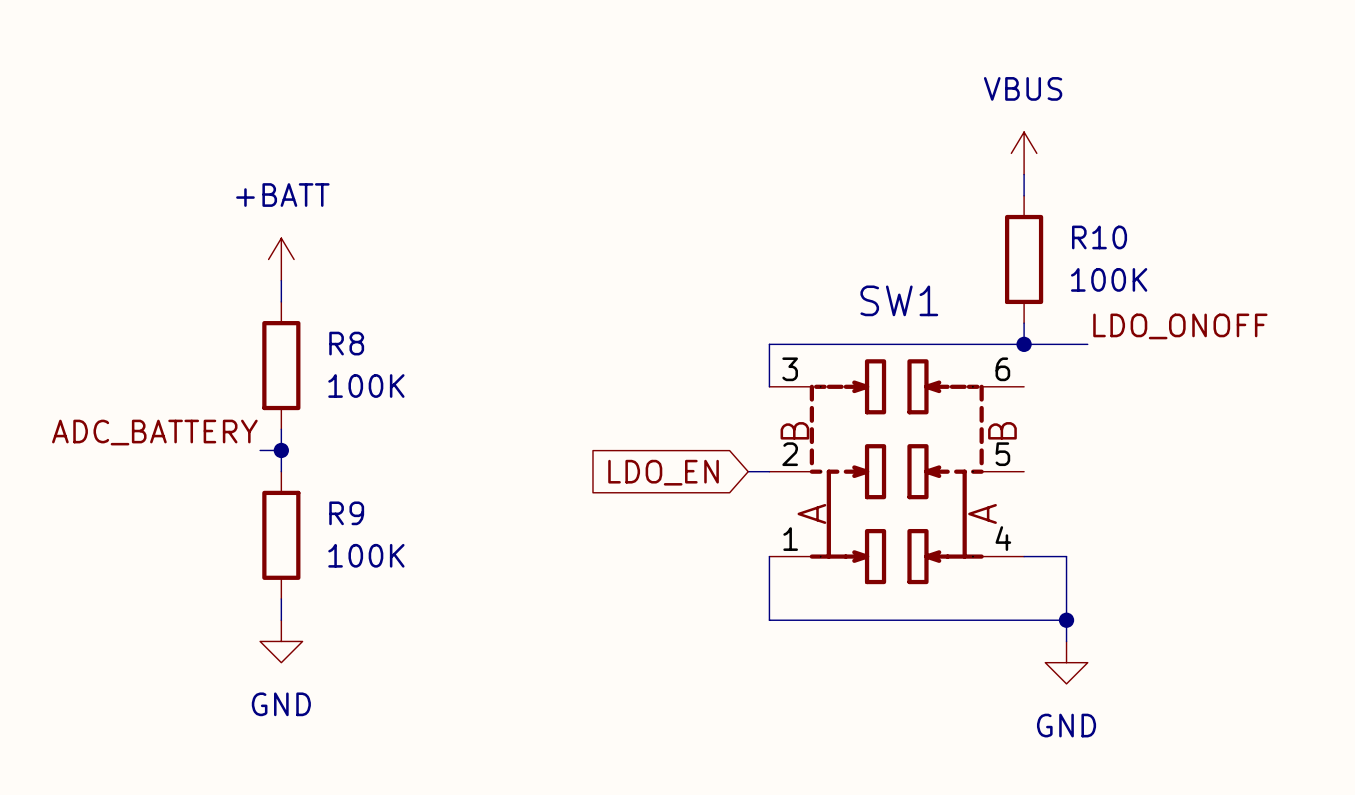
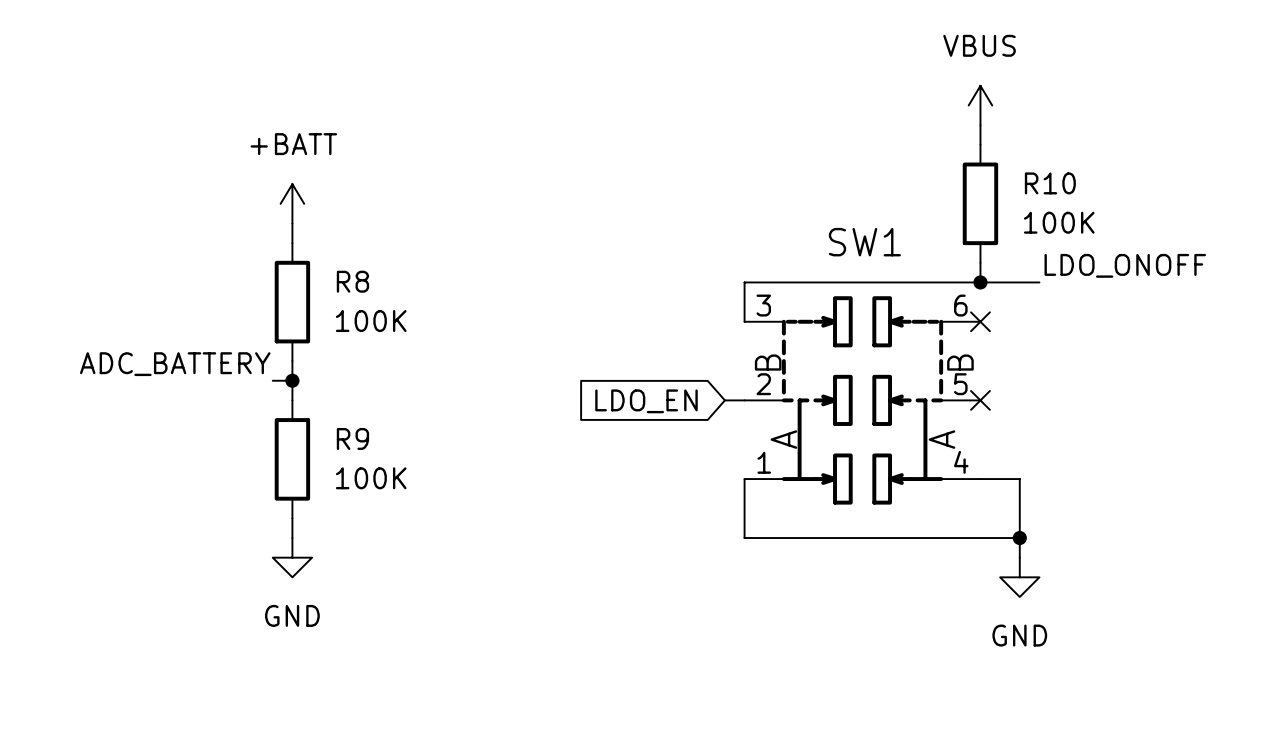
no-connect mark: none -> (980, 321)
no-connect mark: none -> (980, 400)

